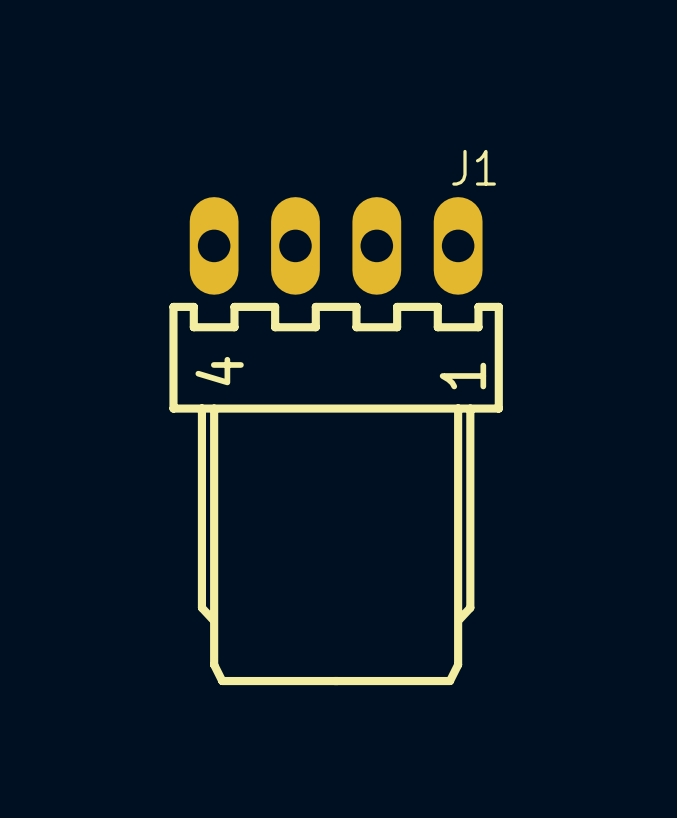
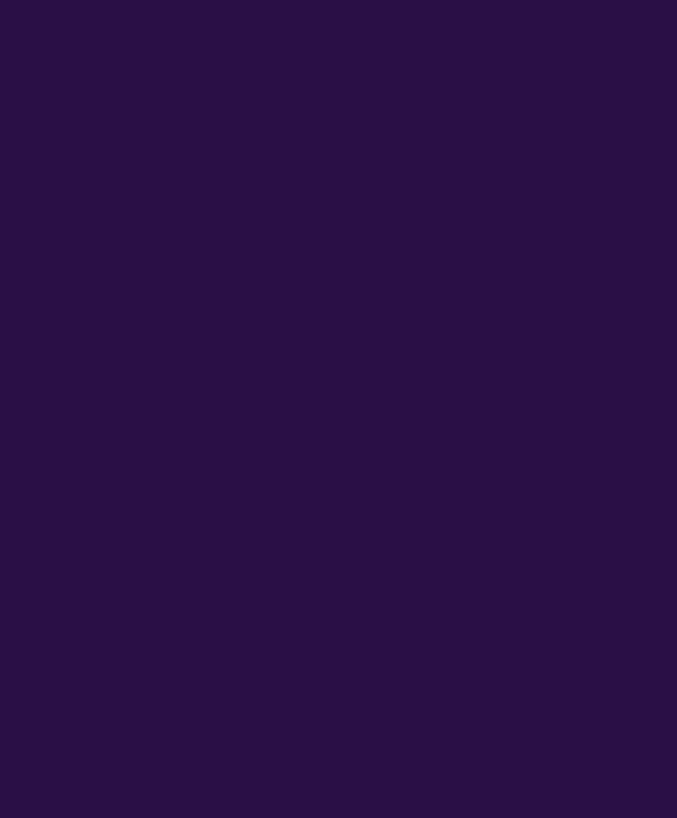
J1: (336, 441) -> none

